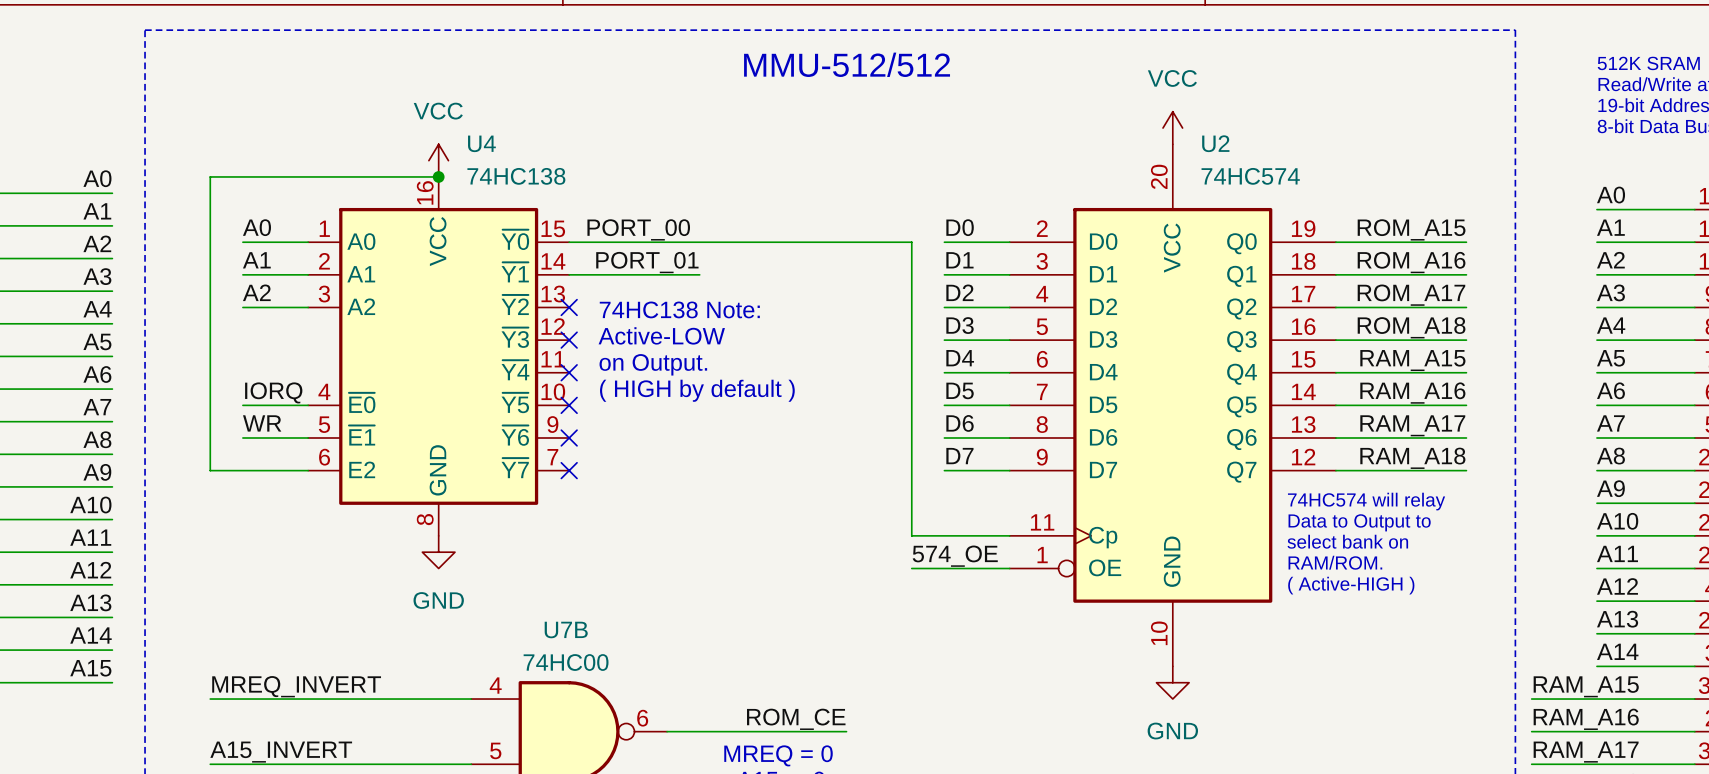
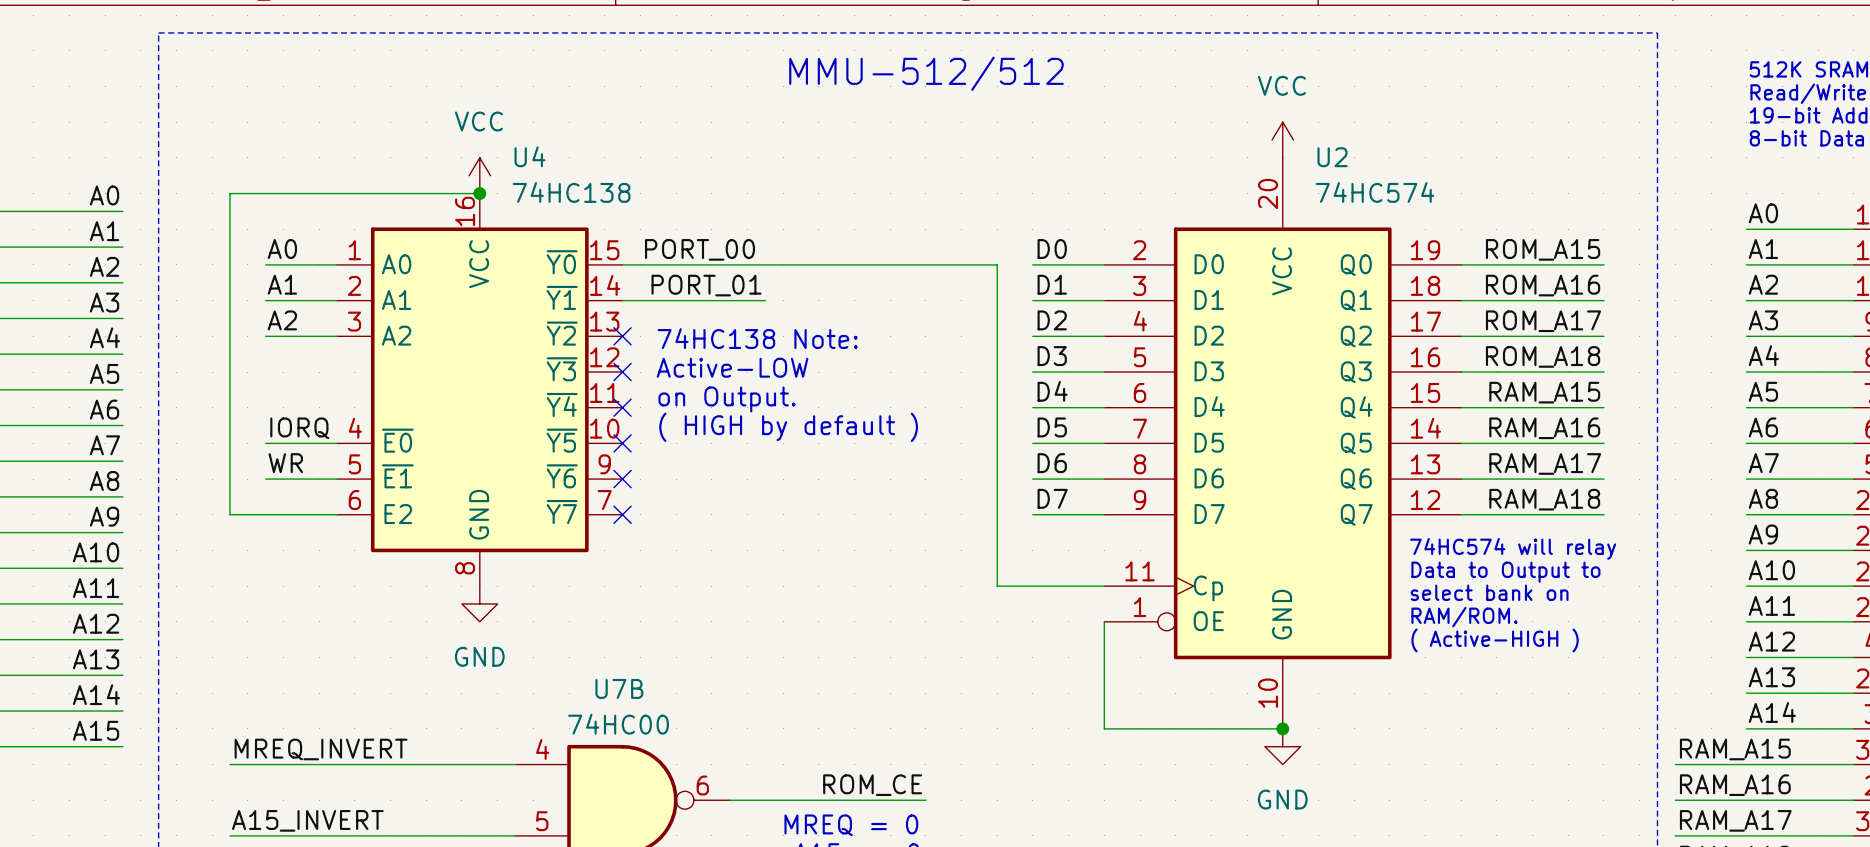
label: 574_OE (955, 556) -> none
wire: (911, 568) (1009, 568) -> (1282, 728) (1104, 728) (1104, 621)
junction: none -> (1282, 728)

